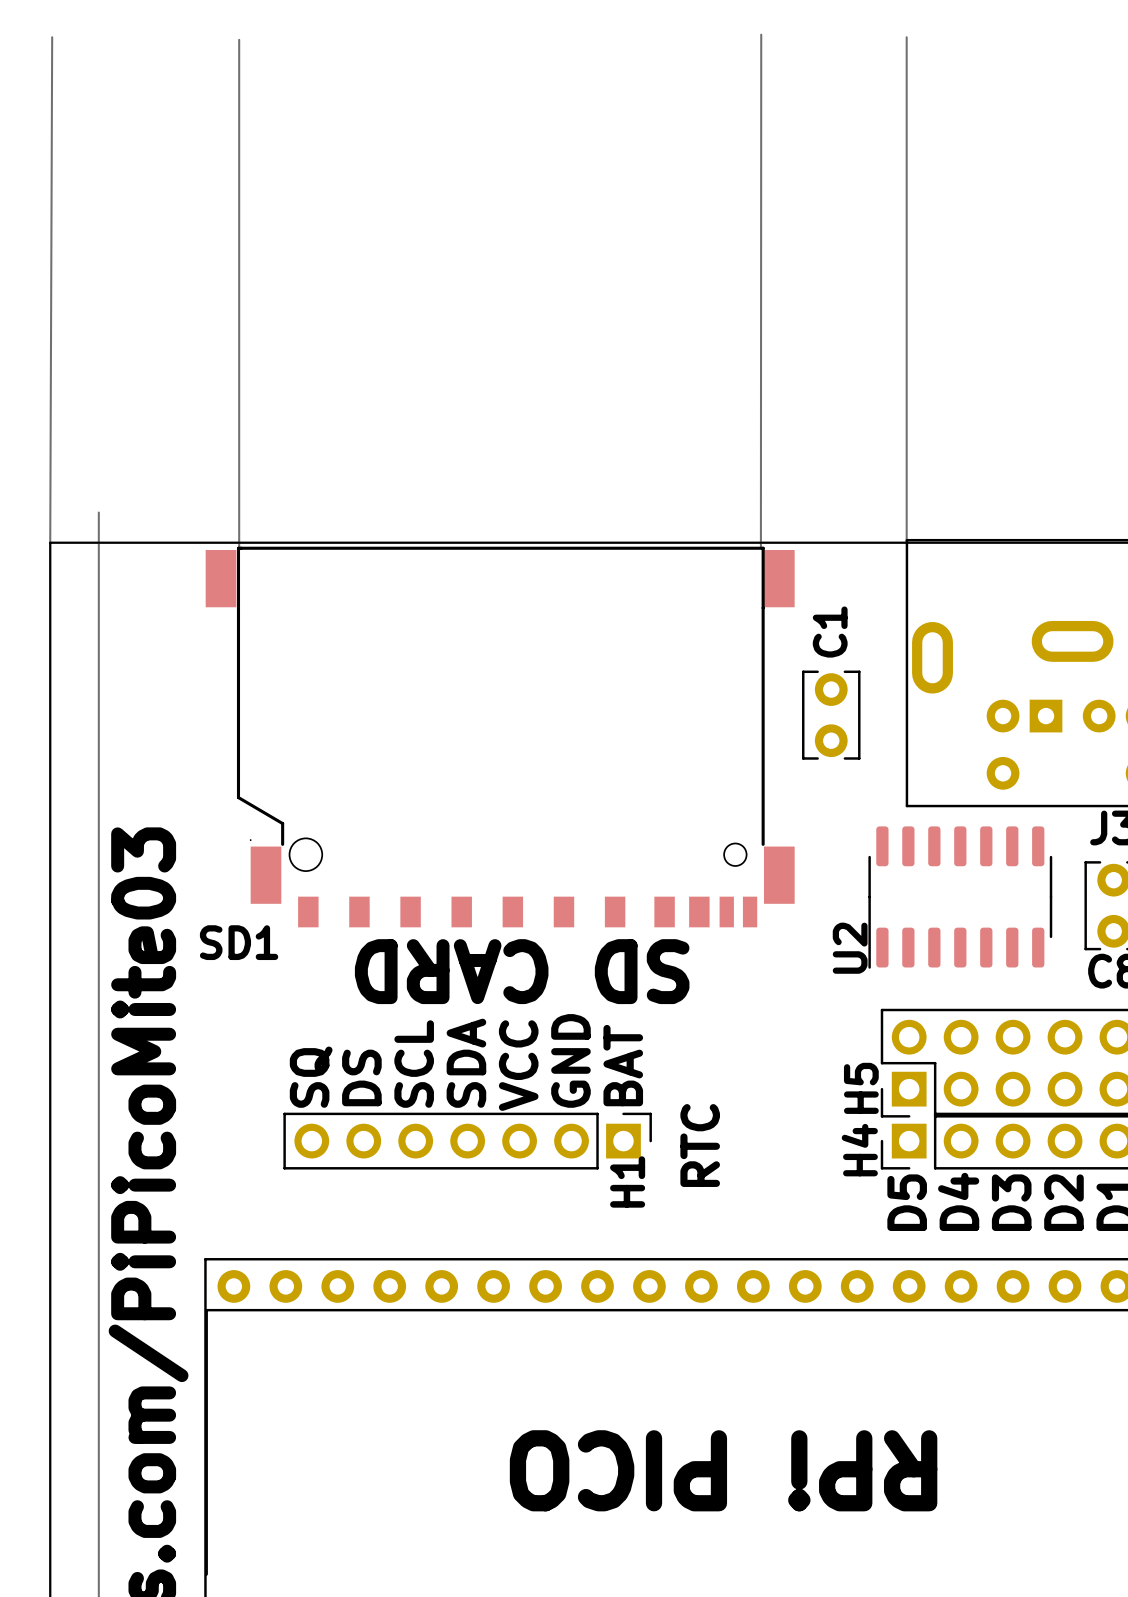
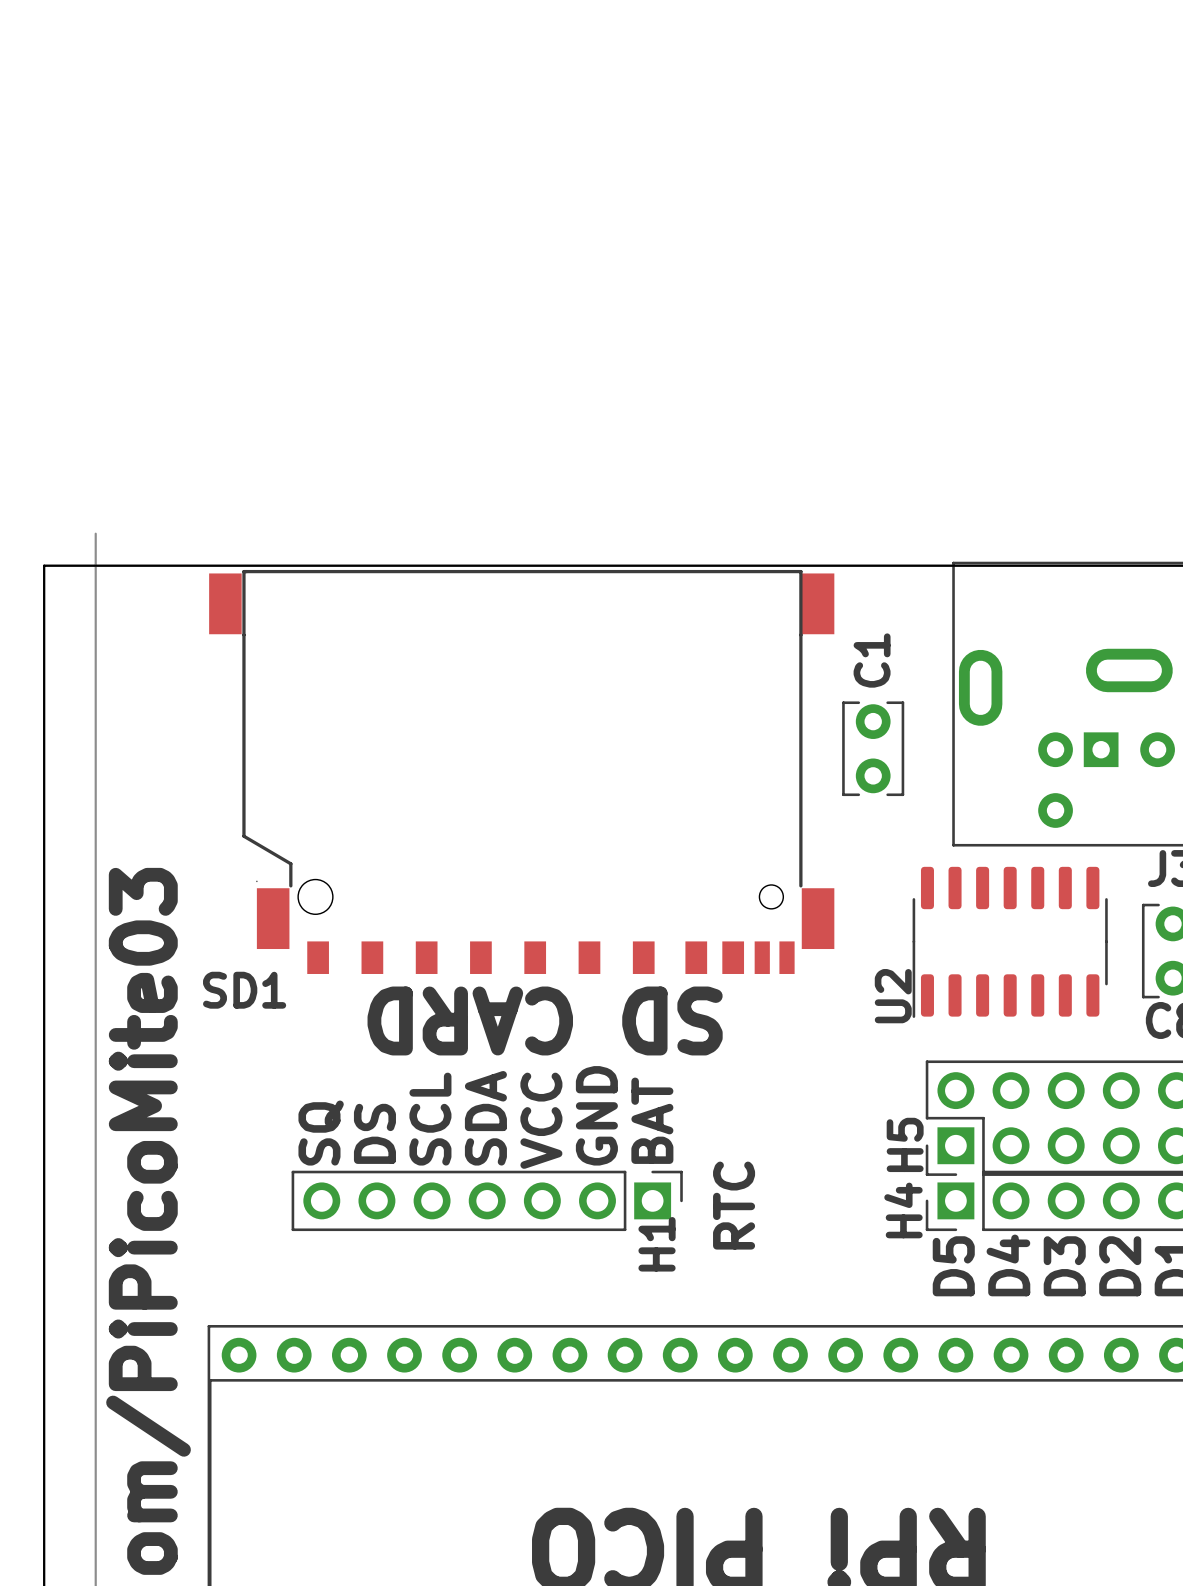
line: (761, 34) (760, 546) -> none
line: (52, 37) (50, 542) -> none
line: (906, 37) (906, 543) -> none
line: (239, 39) (239, 548) -> none

